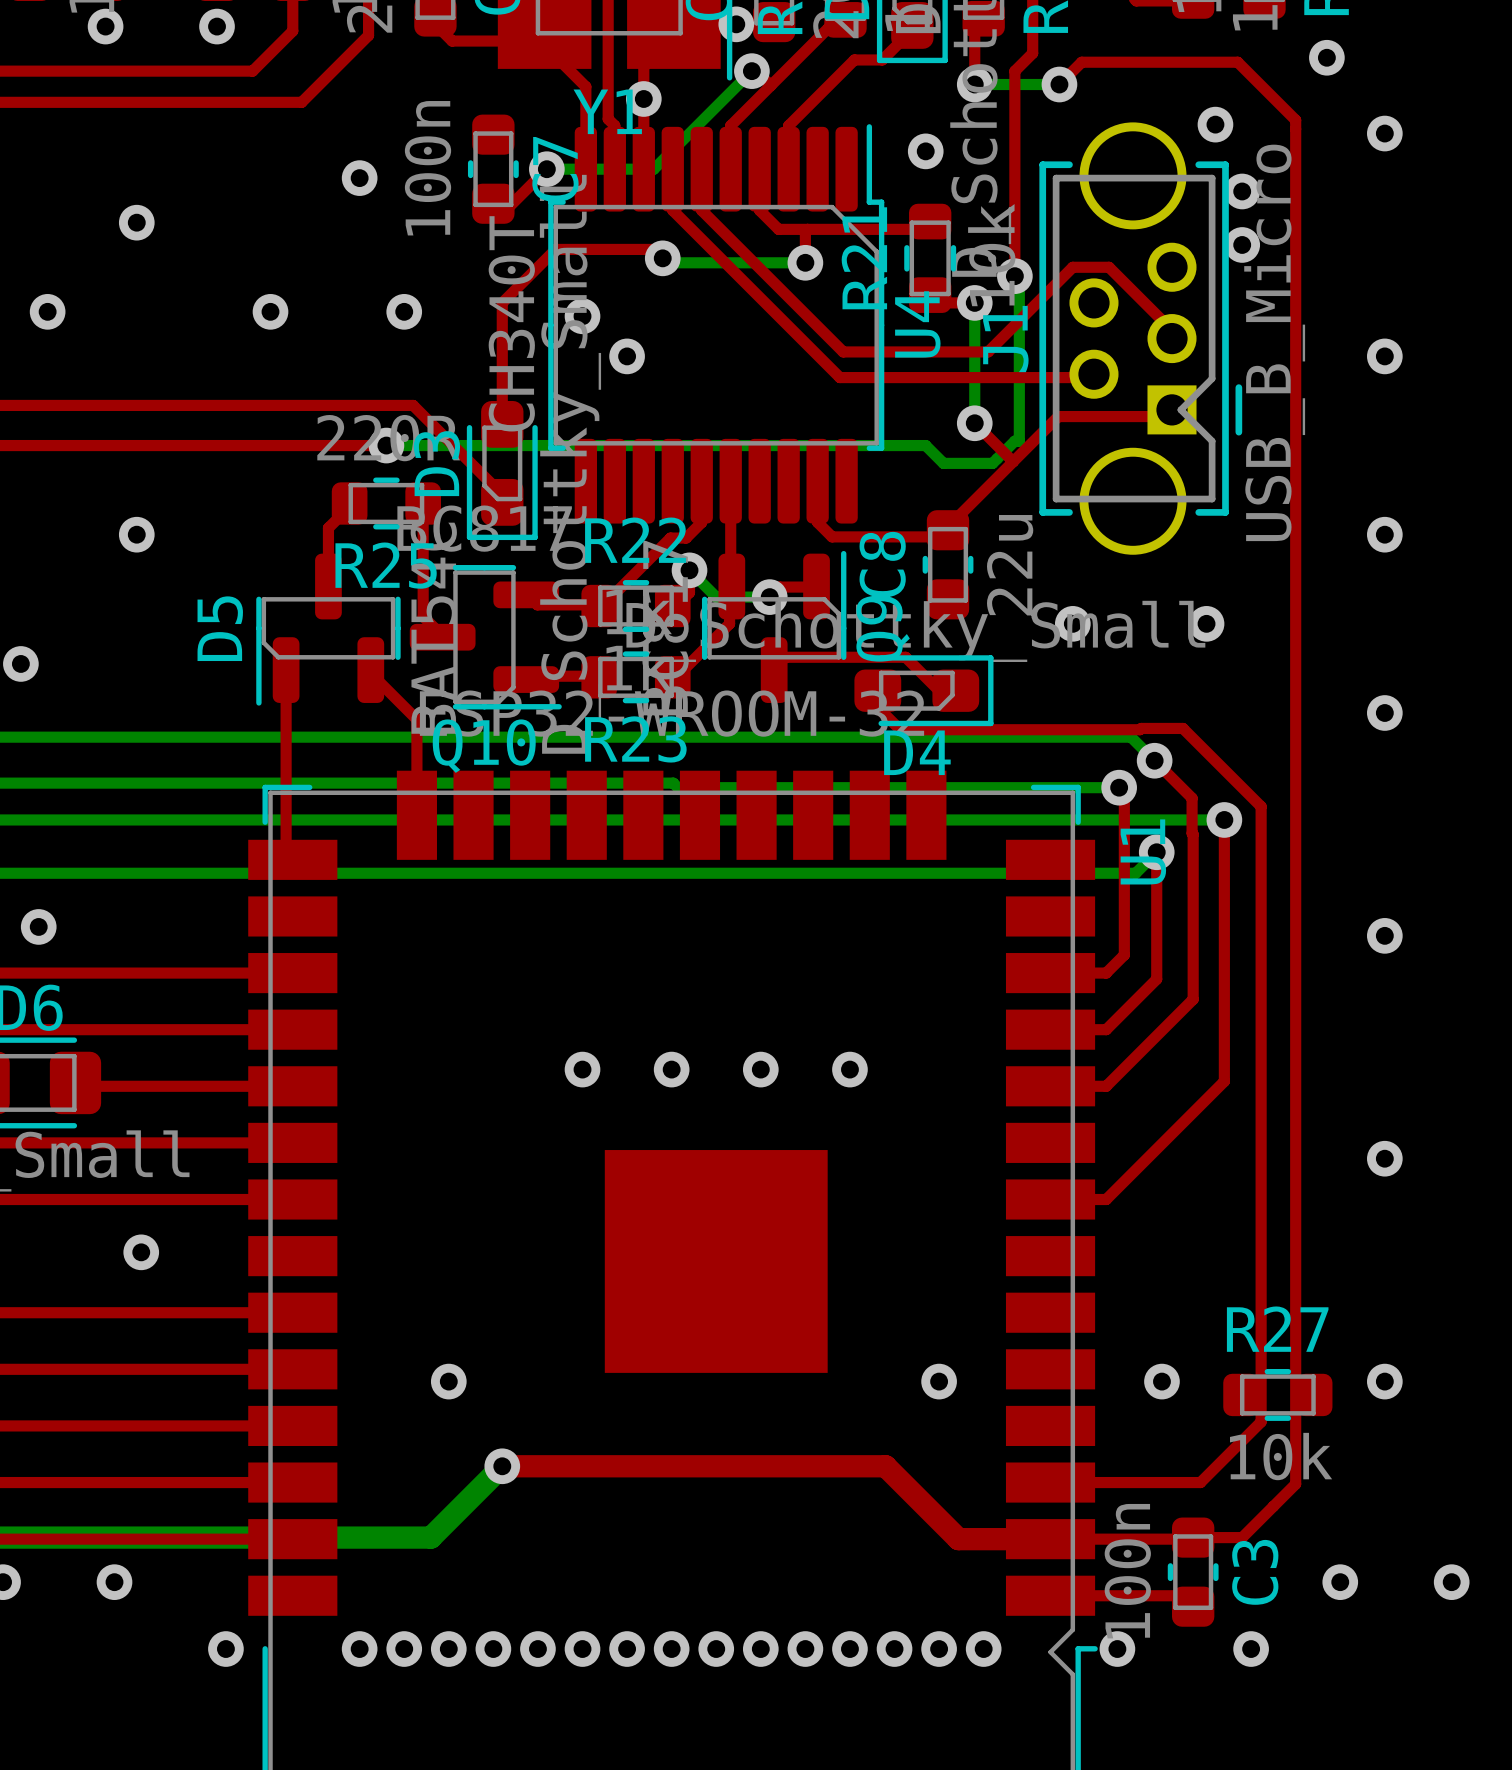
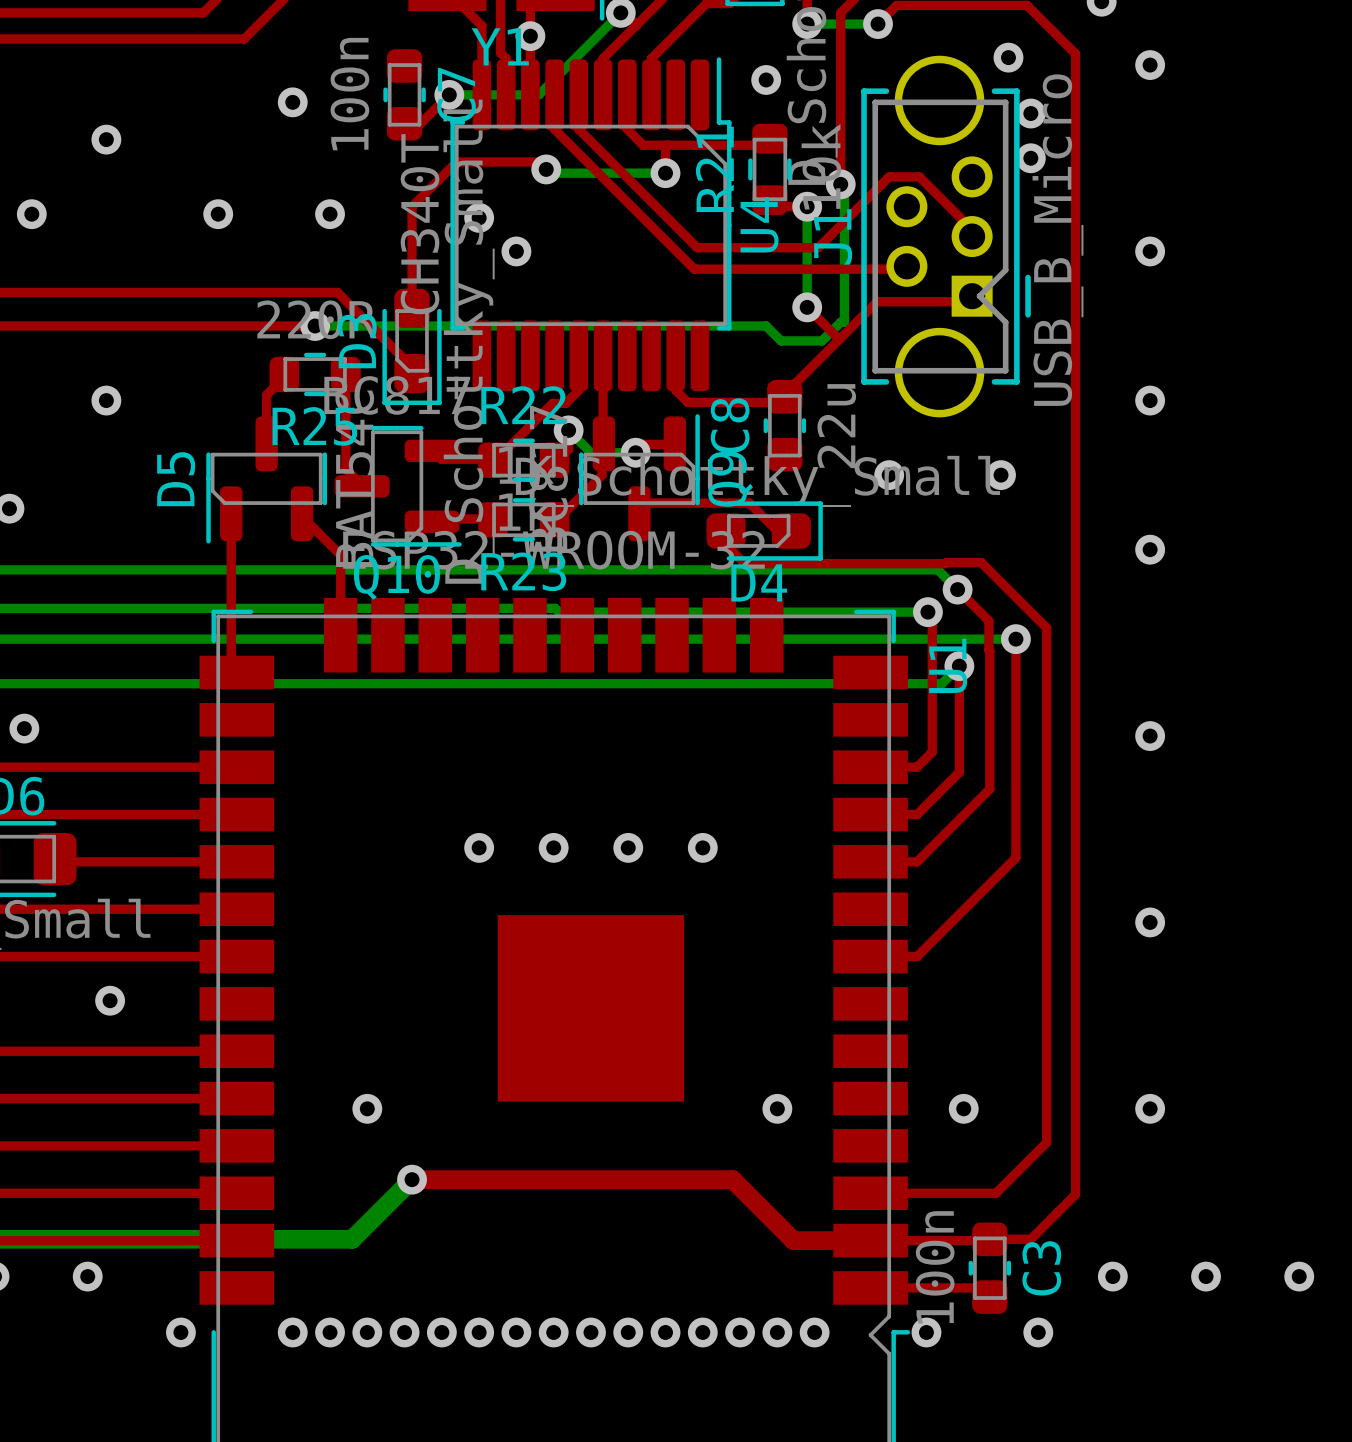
R27: 10k (1277, 1394) -> none

